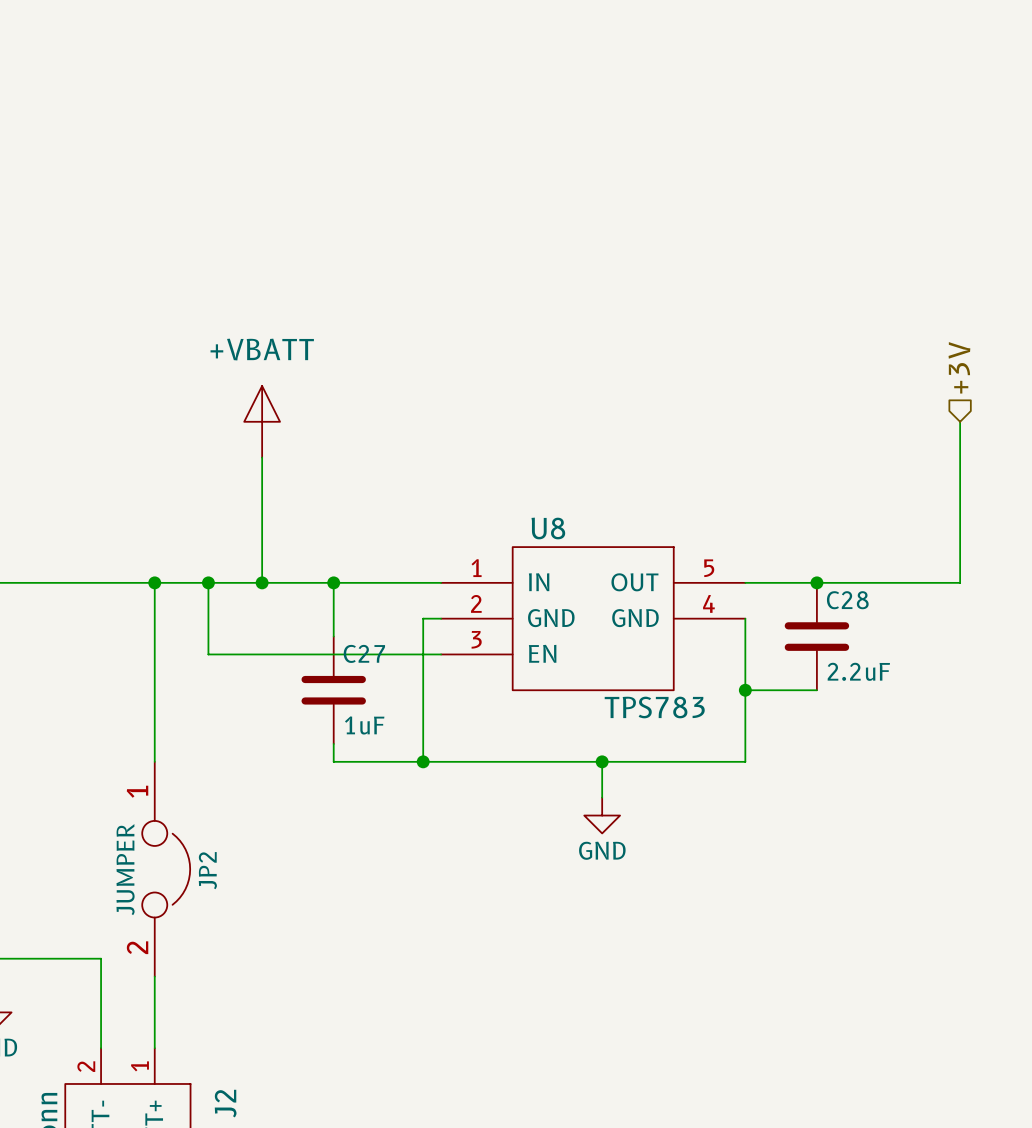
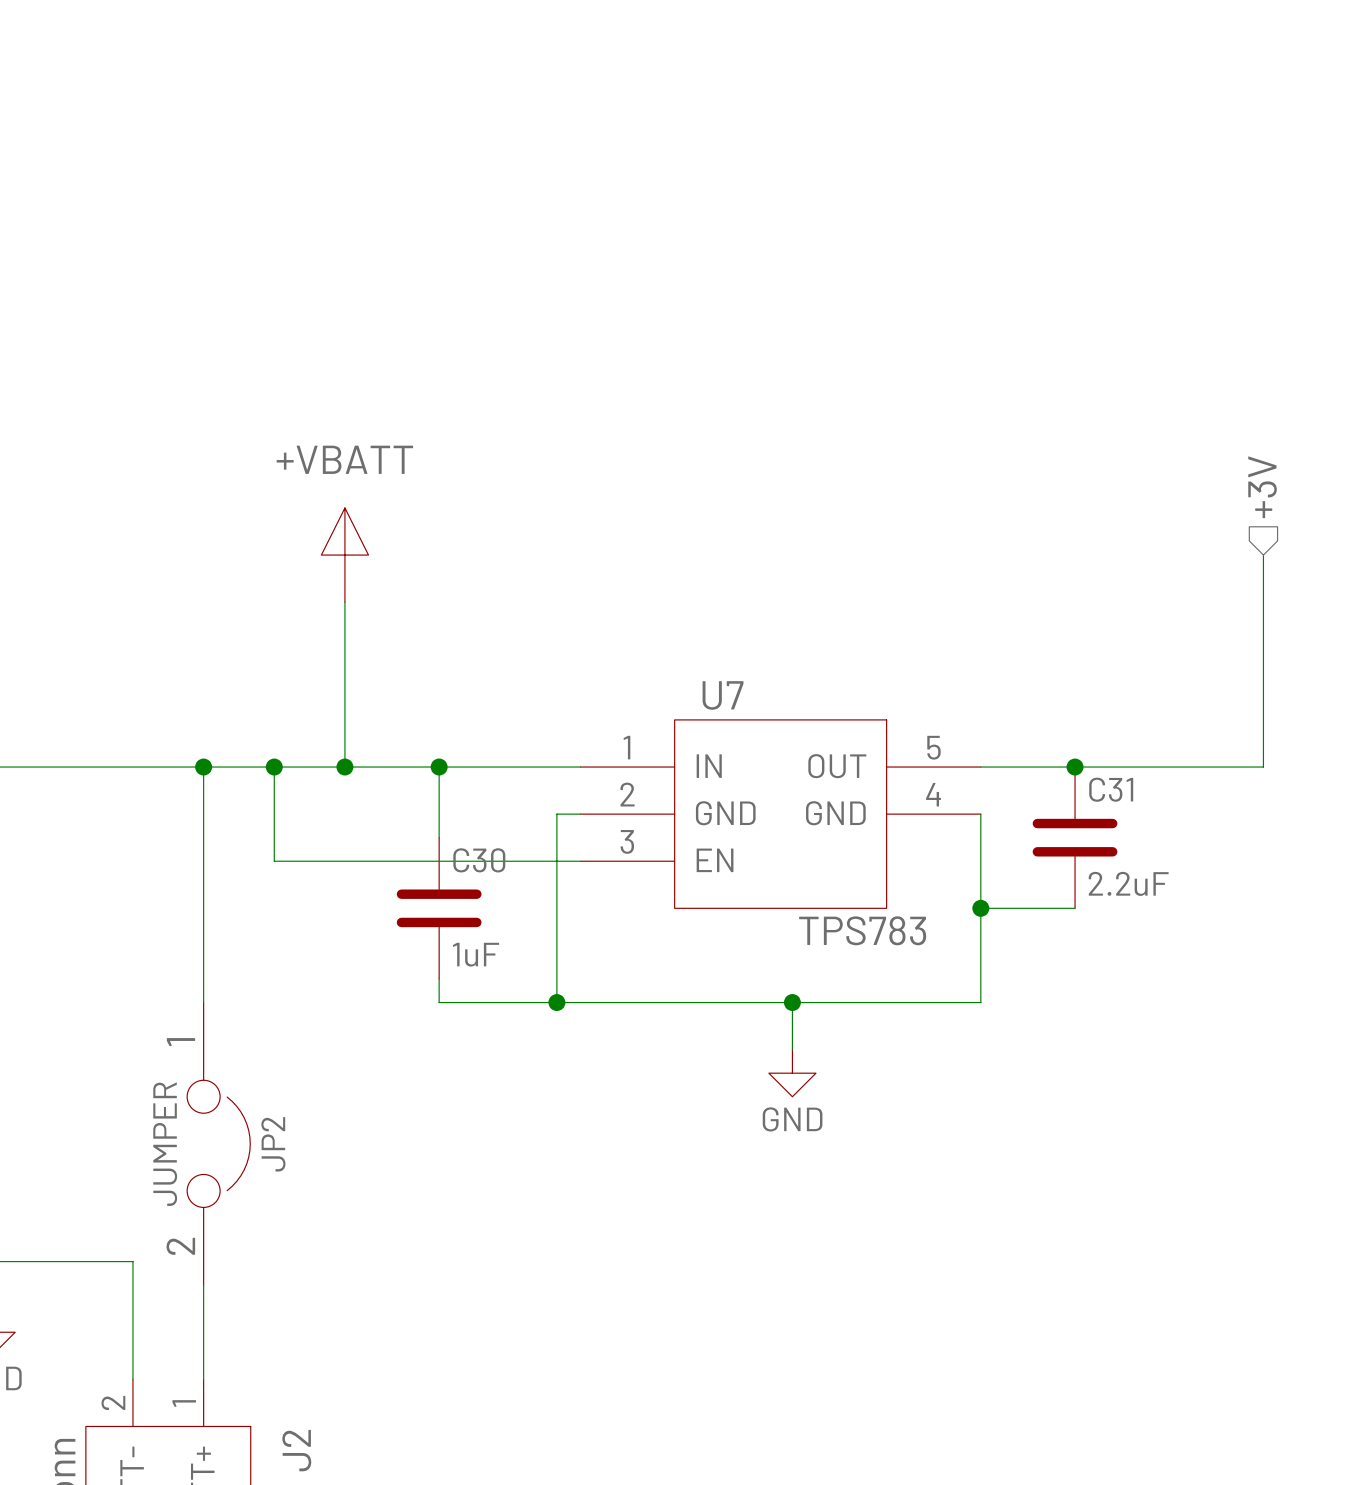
U8 name: U8 (548, 528) -> U7 (723, 695)
C28 name: C28 (847, 600) -> C31 (1111, 789)
C27 name: C27 (364, 653) -> C30 (479, 860)

